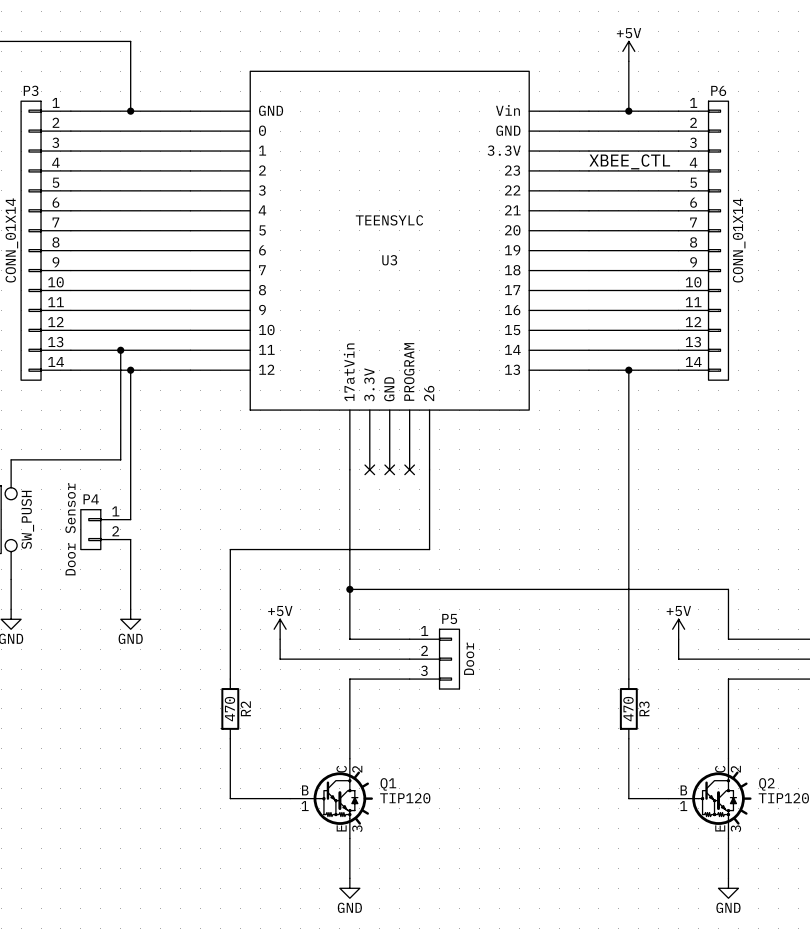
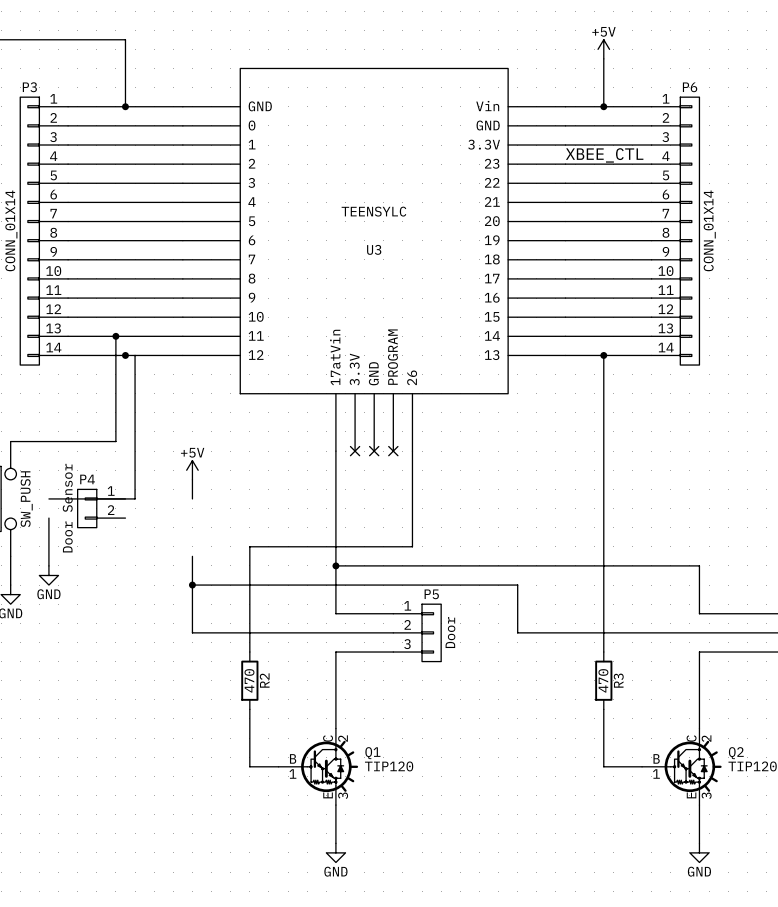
wire: (130, 370) (130, 519) -> none
wire: none -> (135, 355) (135, 498) (48, 498)
wire: none -> (192, 479) (192, 498)
wire: none -> (48, 518) (48, 565)
wire: (130, 539) (130, 609) -> none
wire: (429, 549) (230, 549) (230, 679) -> (412, 527) (412, 546) (249, 546) (249, 652)
junction: none -> (192, 585)
power symbol position: GND (130, 619) -> GND (48, 575)
power symbol position: +5V (280, 629) -> +5V (192, 470)
power symbol: +5V (678, 629) -> none
wire: (280, 639) (280, 659) -> (192, 556) (192, 632) (268, 632)
wire: (678, 639) (678, 659) -> (192, 585) (517, 585) (517, 632) (651, 632)
R2 position: (230, 708) -> (249, 680)
wire: (230, 738) (230, 798) (260, 798) -> (249, 709) (249, 766)

